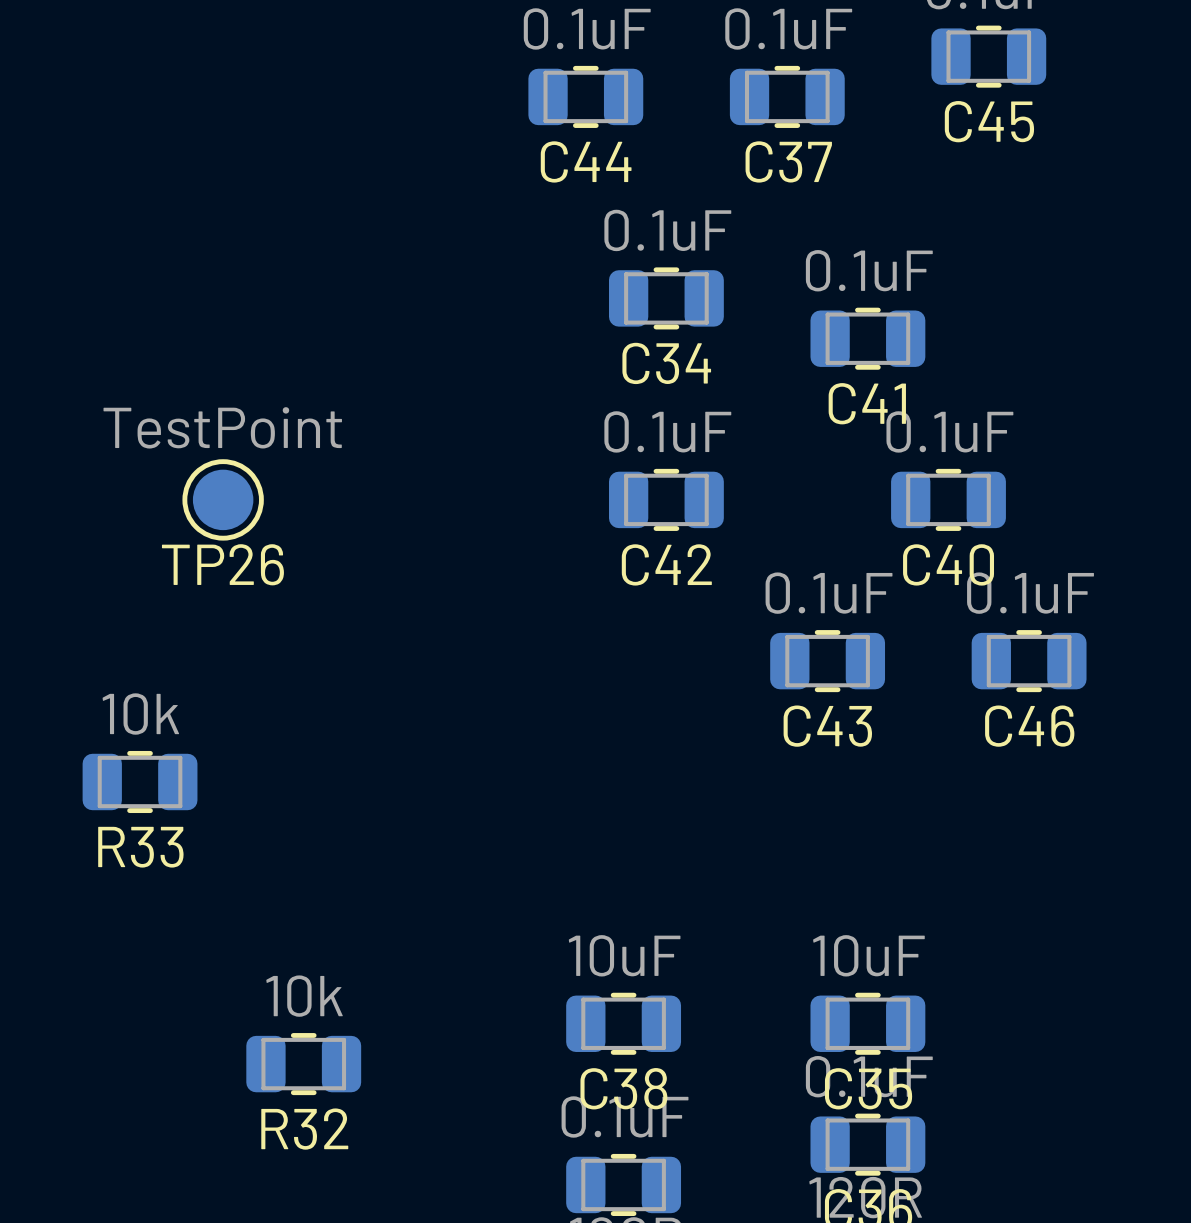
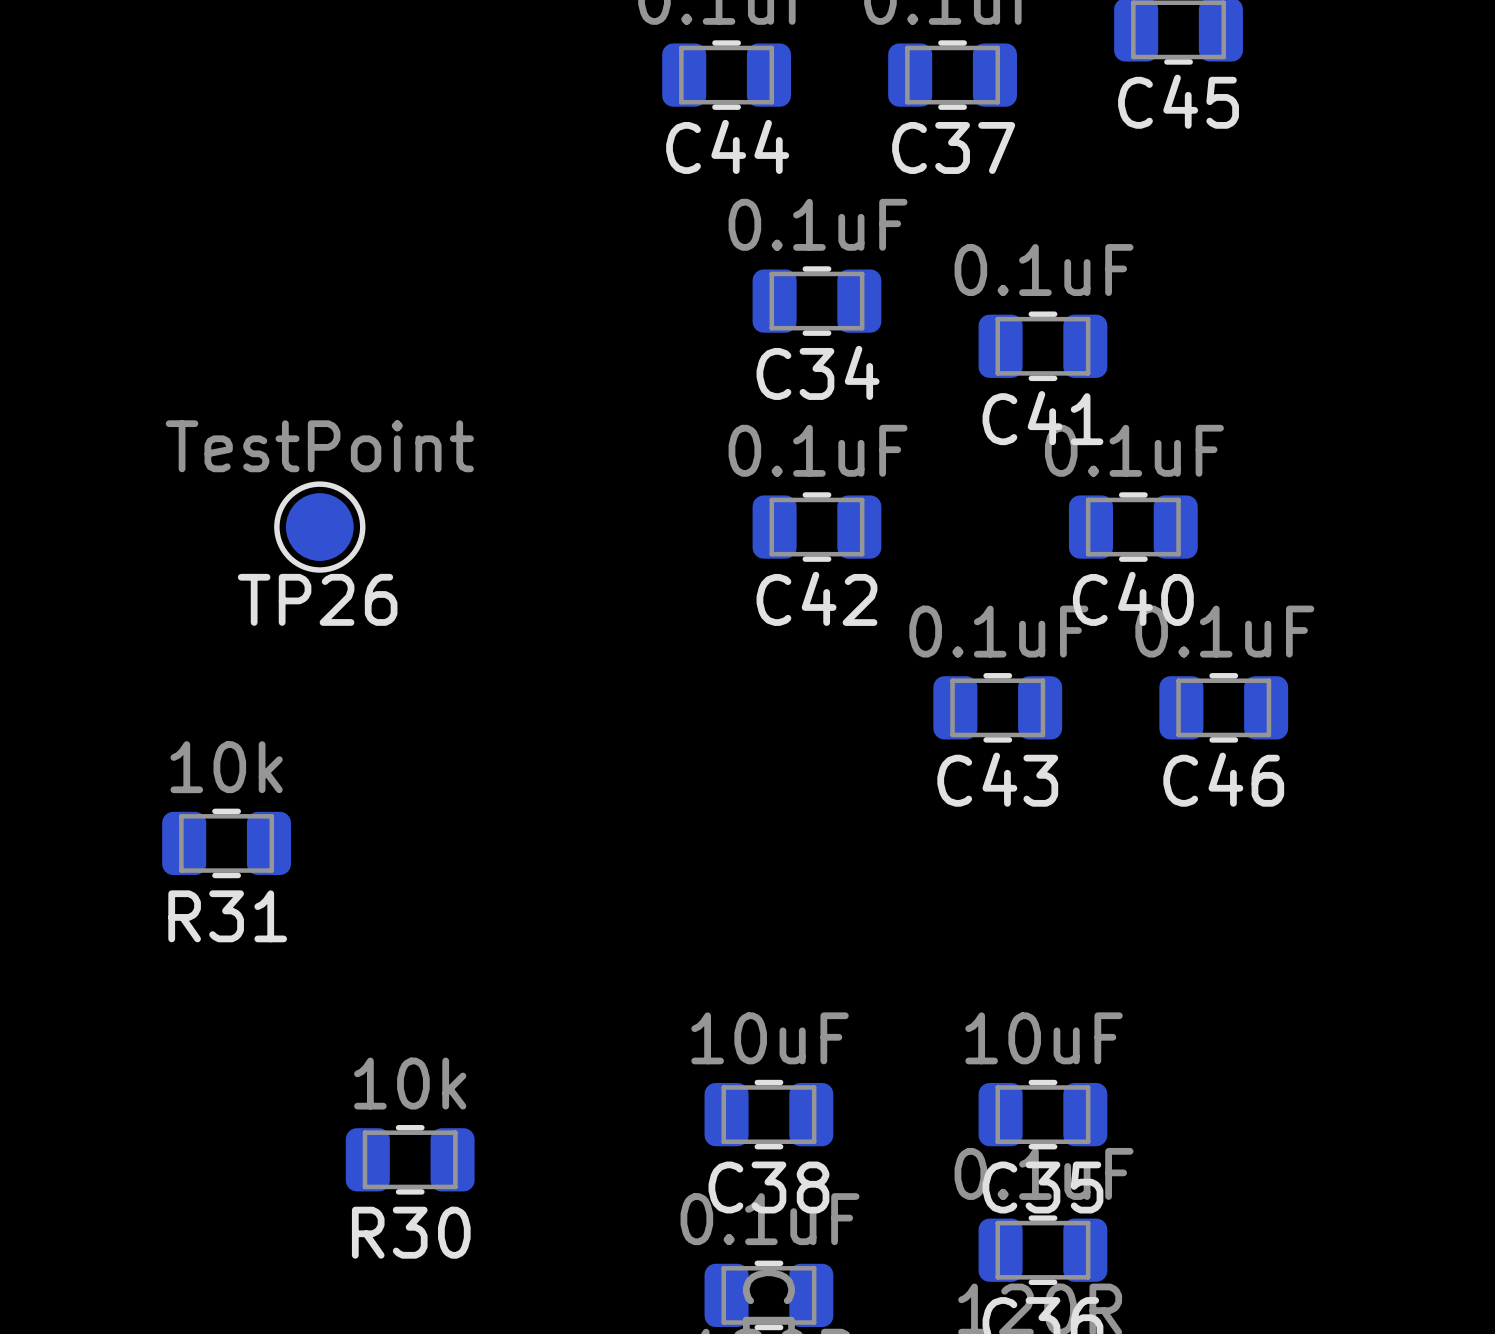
R33 name: R33 (140, 847) -> R31 (227, 916)
R32 name: R32 (304, 1129) -> R30 (411, 1232)

